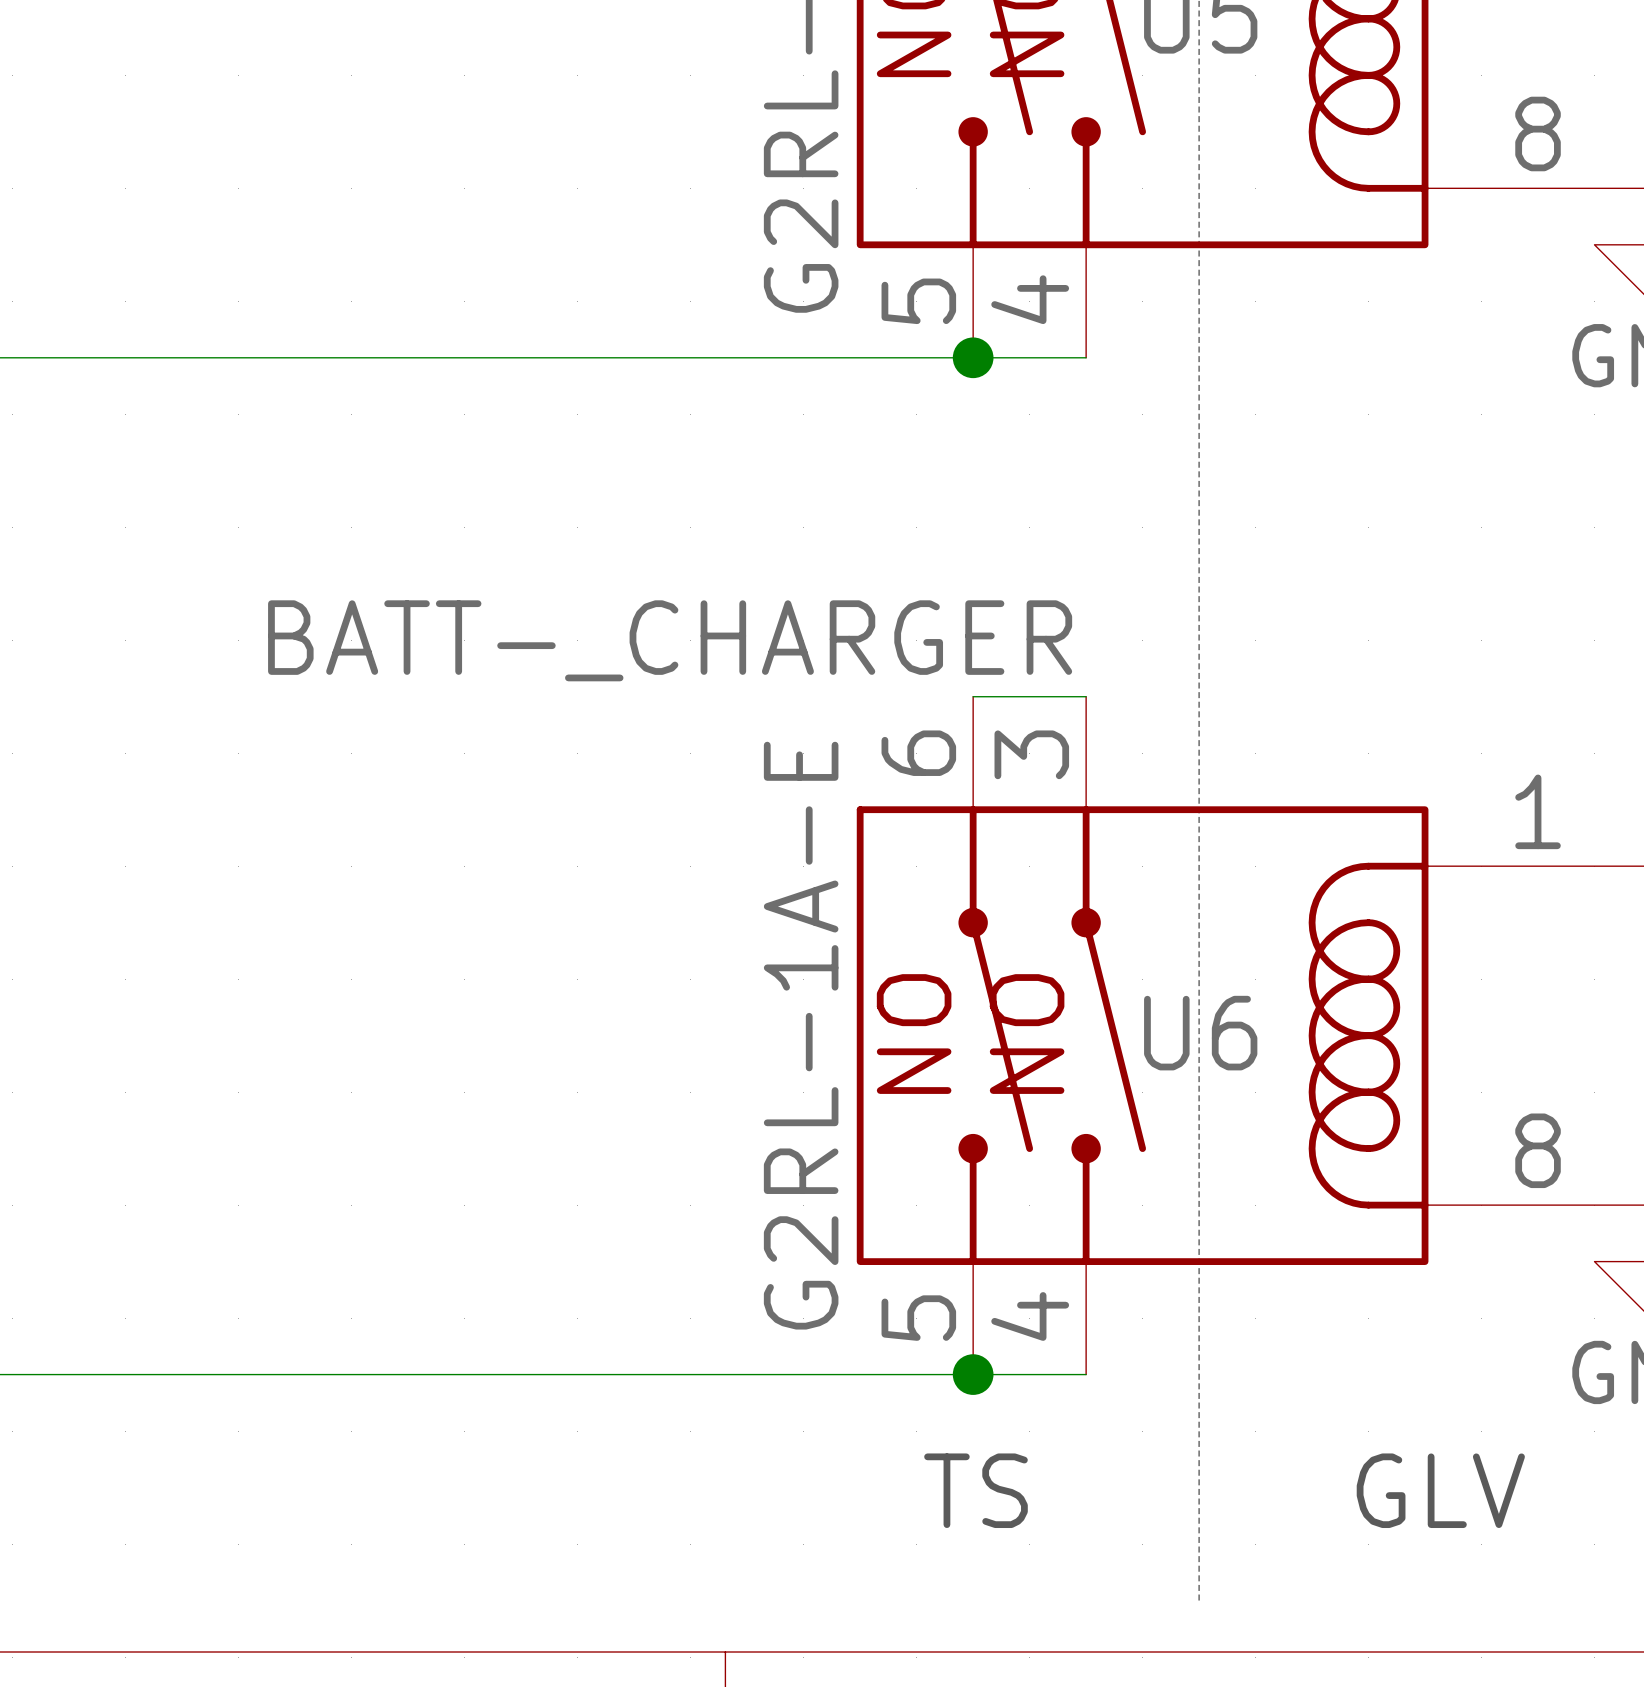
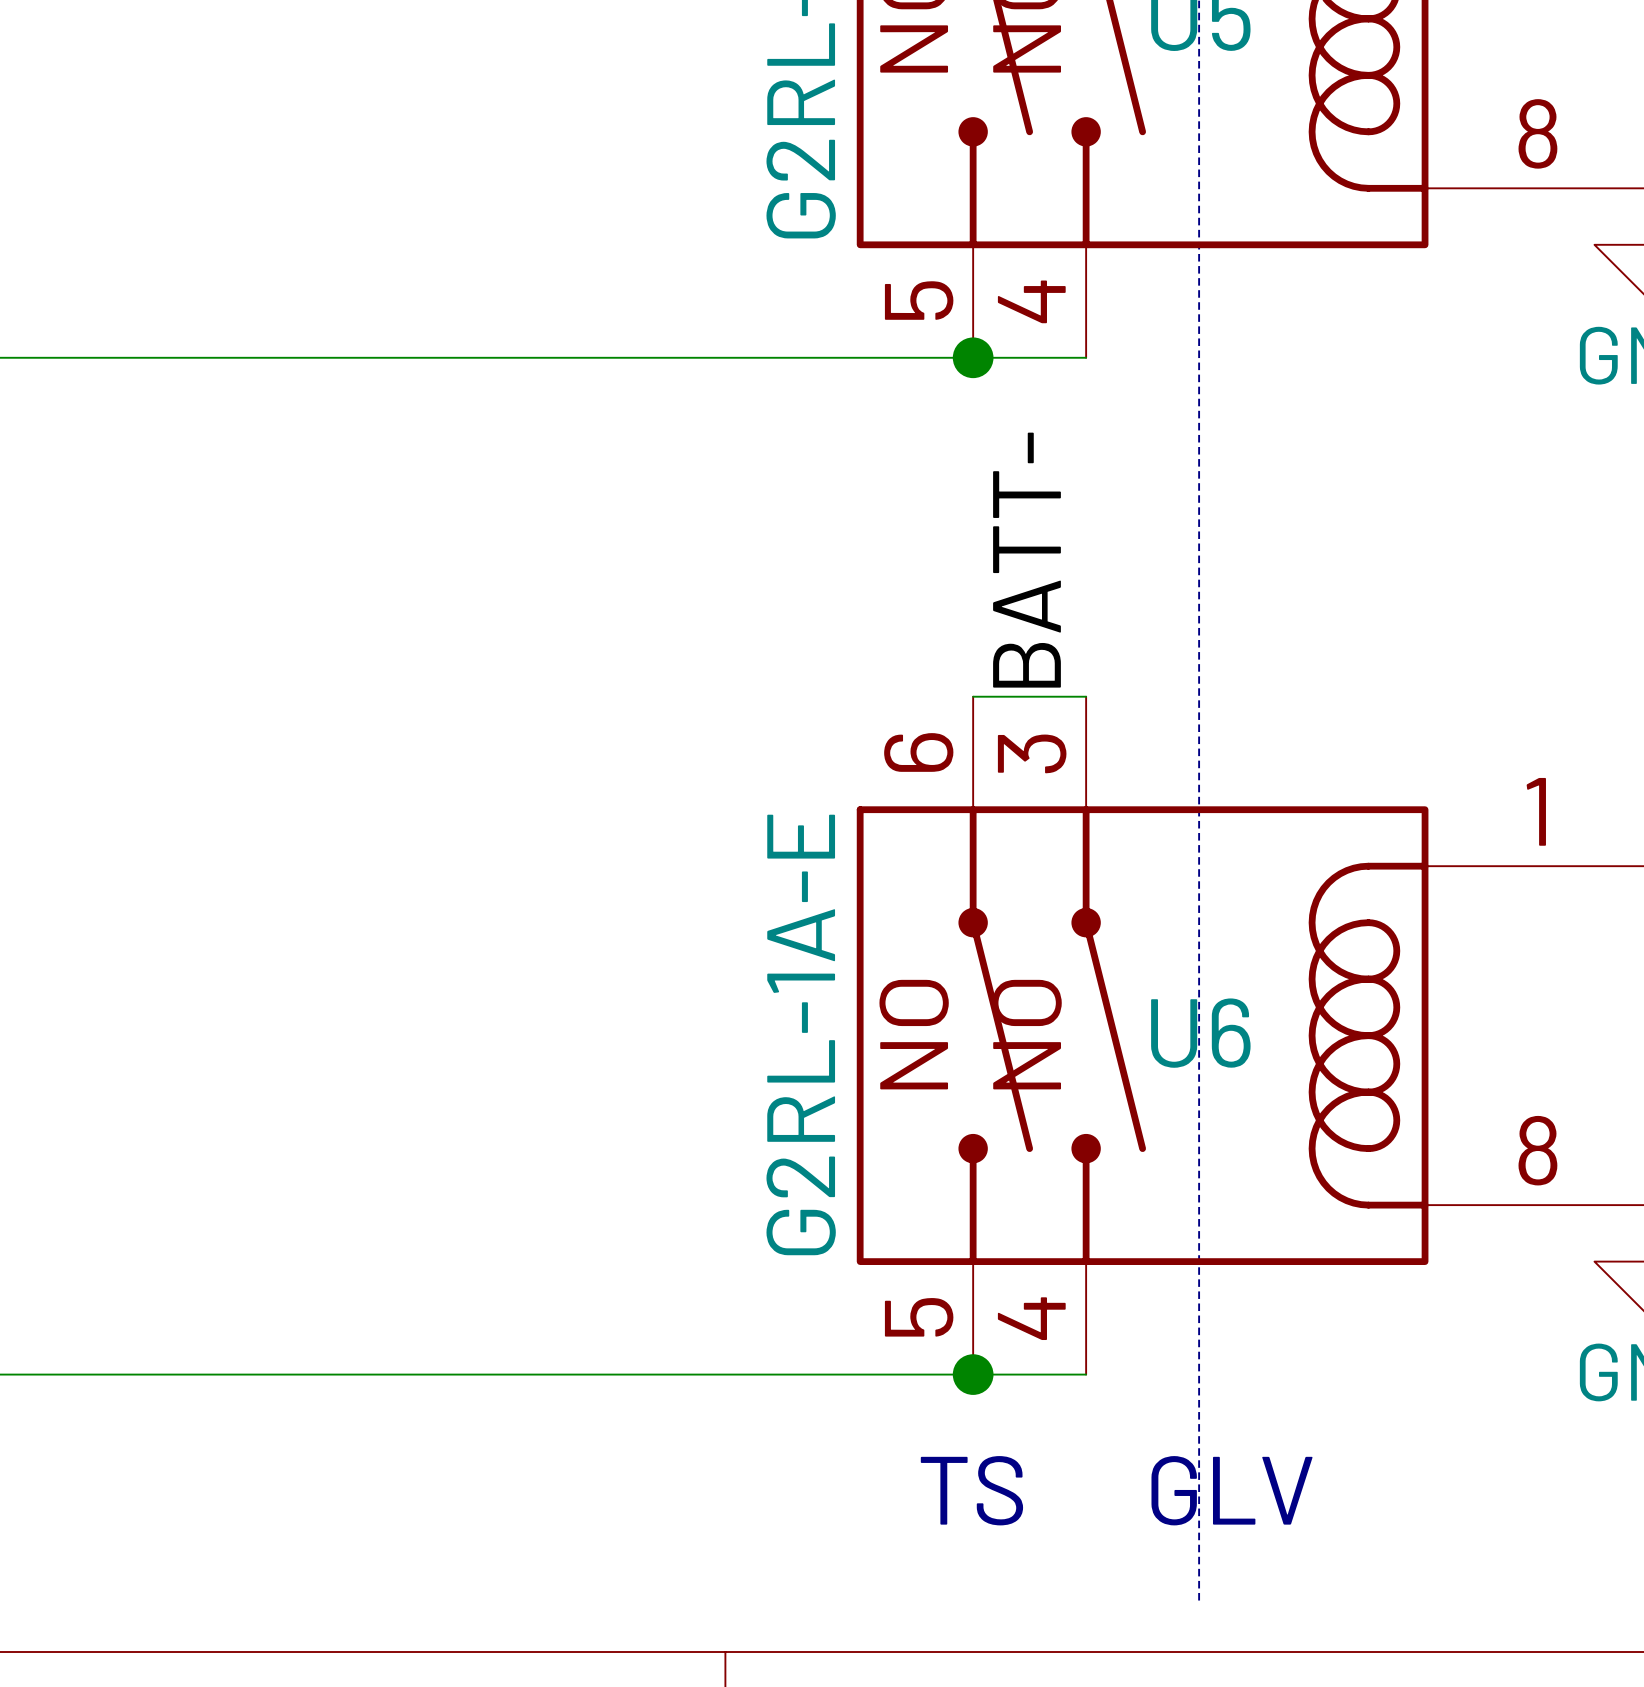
label: BATT-_CHARGER (670, 640) -> BATT- (1026, 560)

